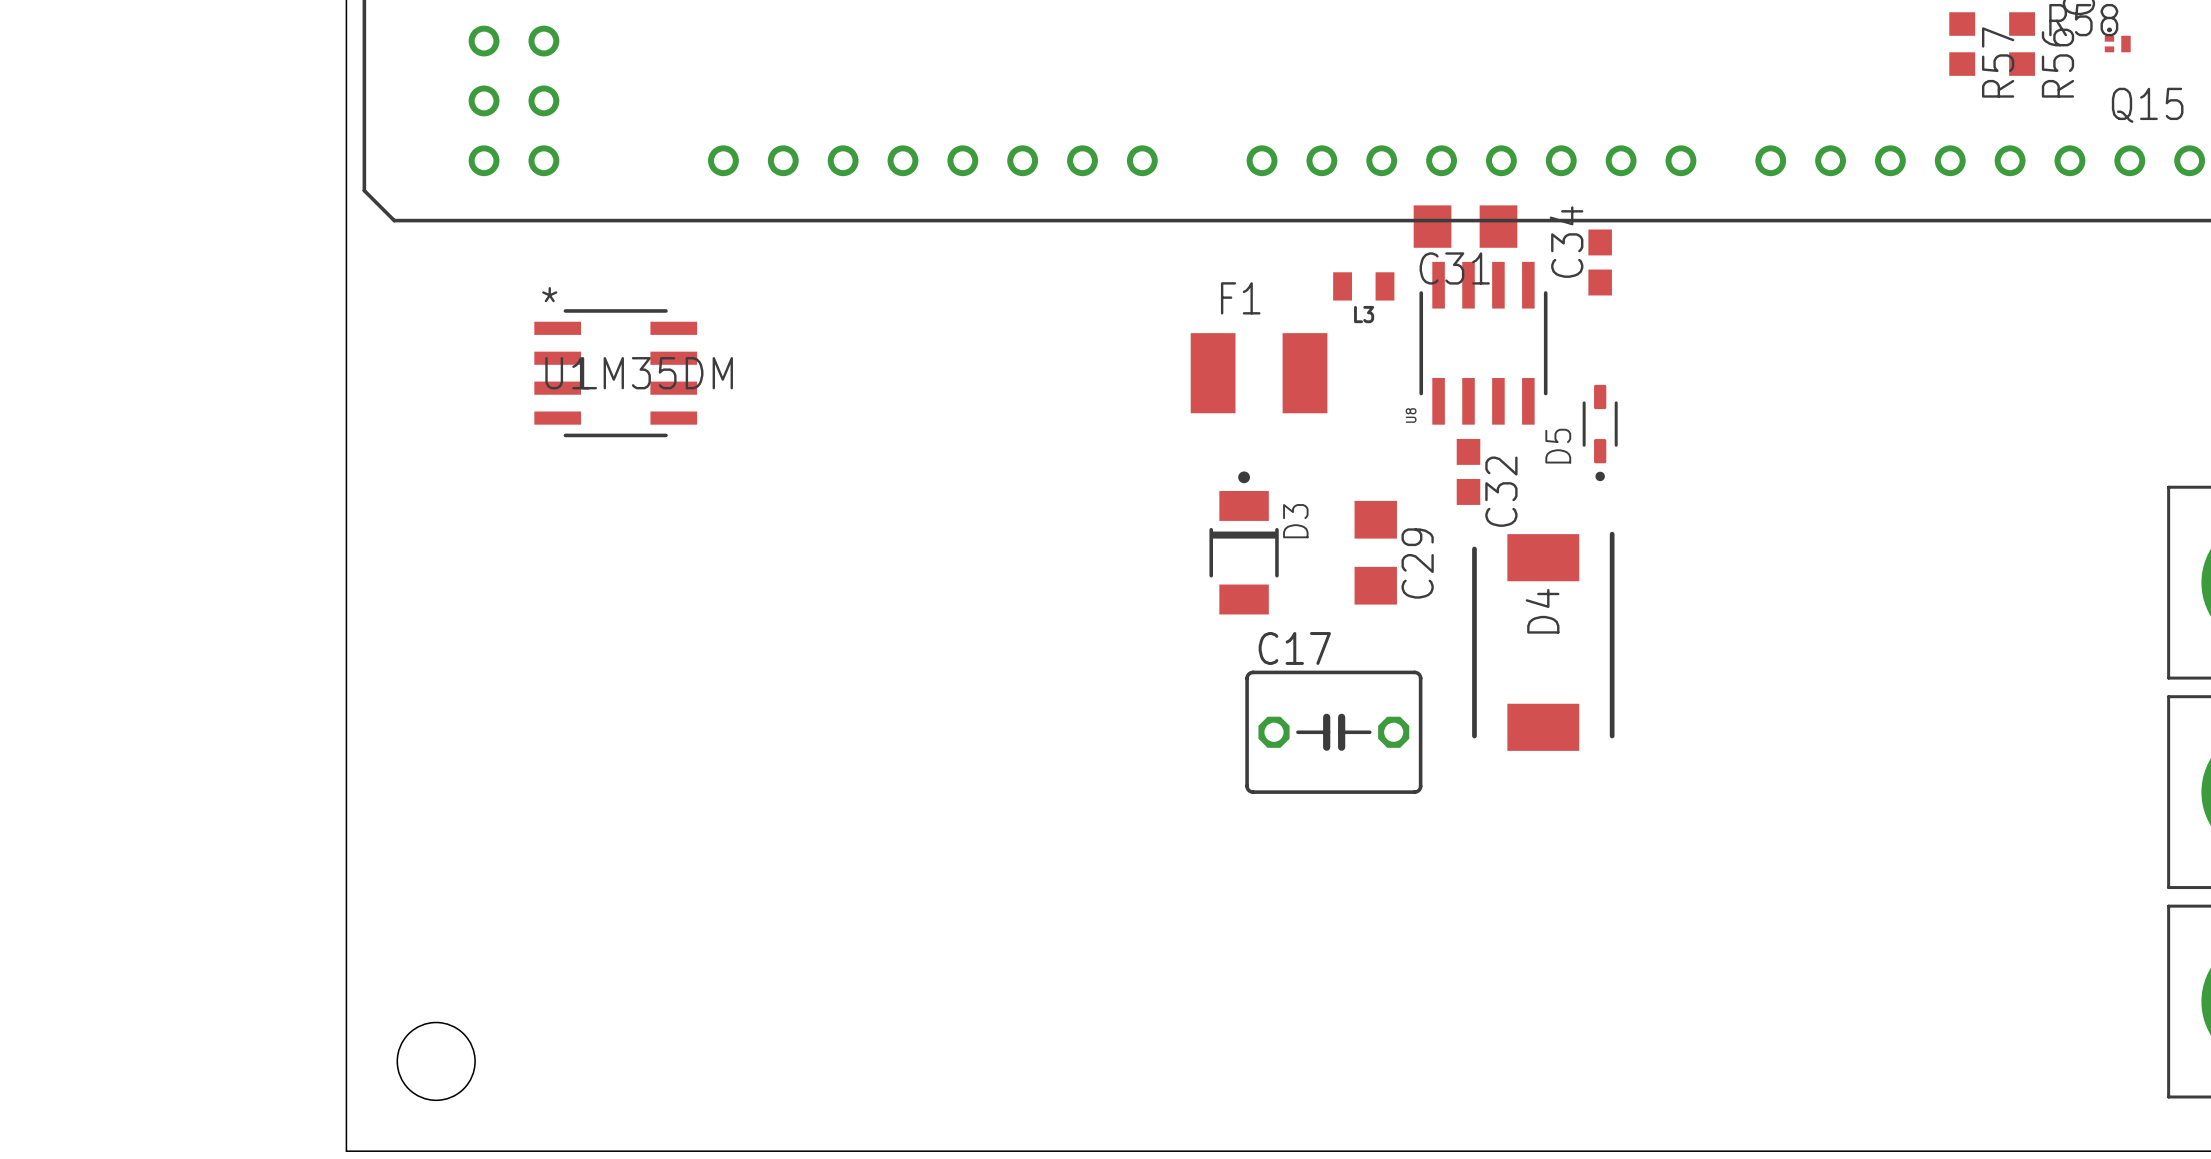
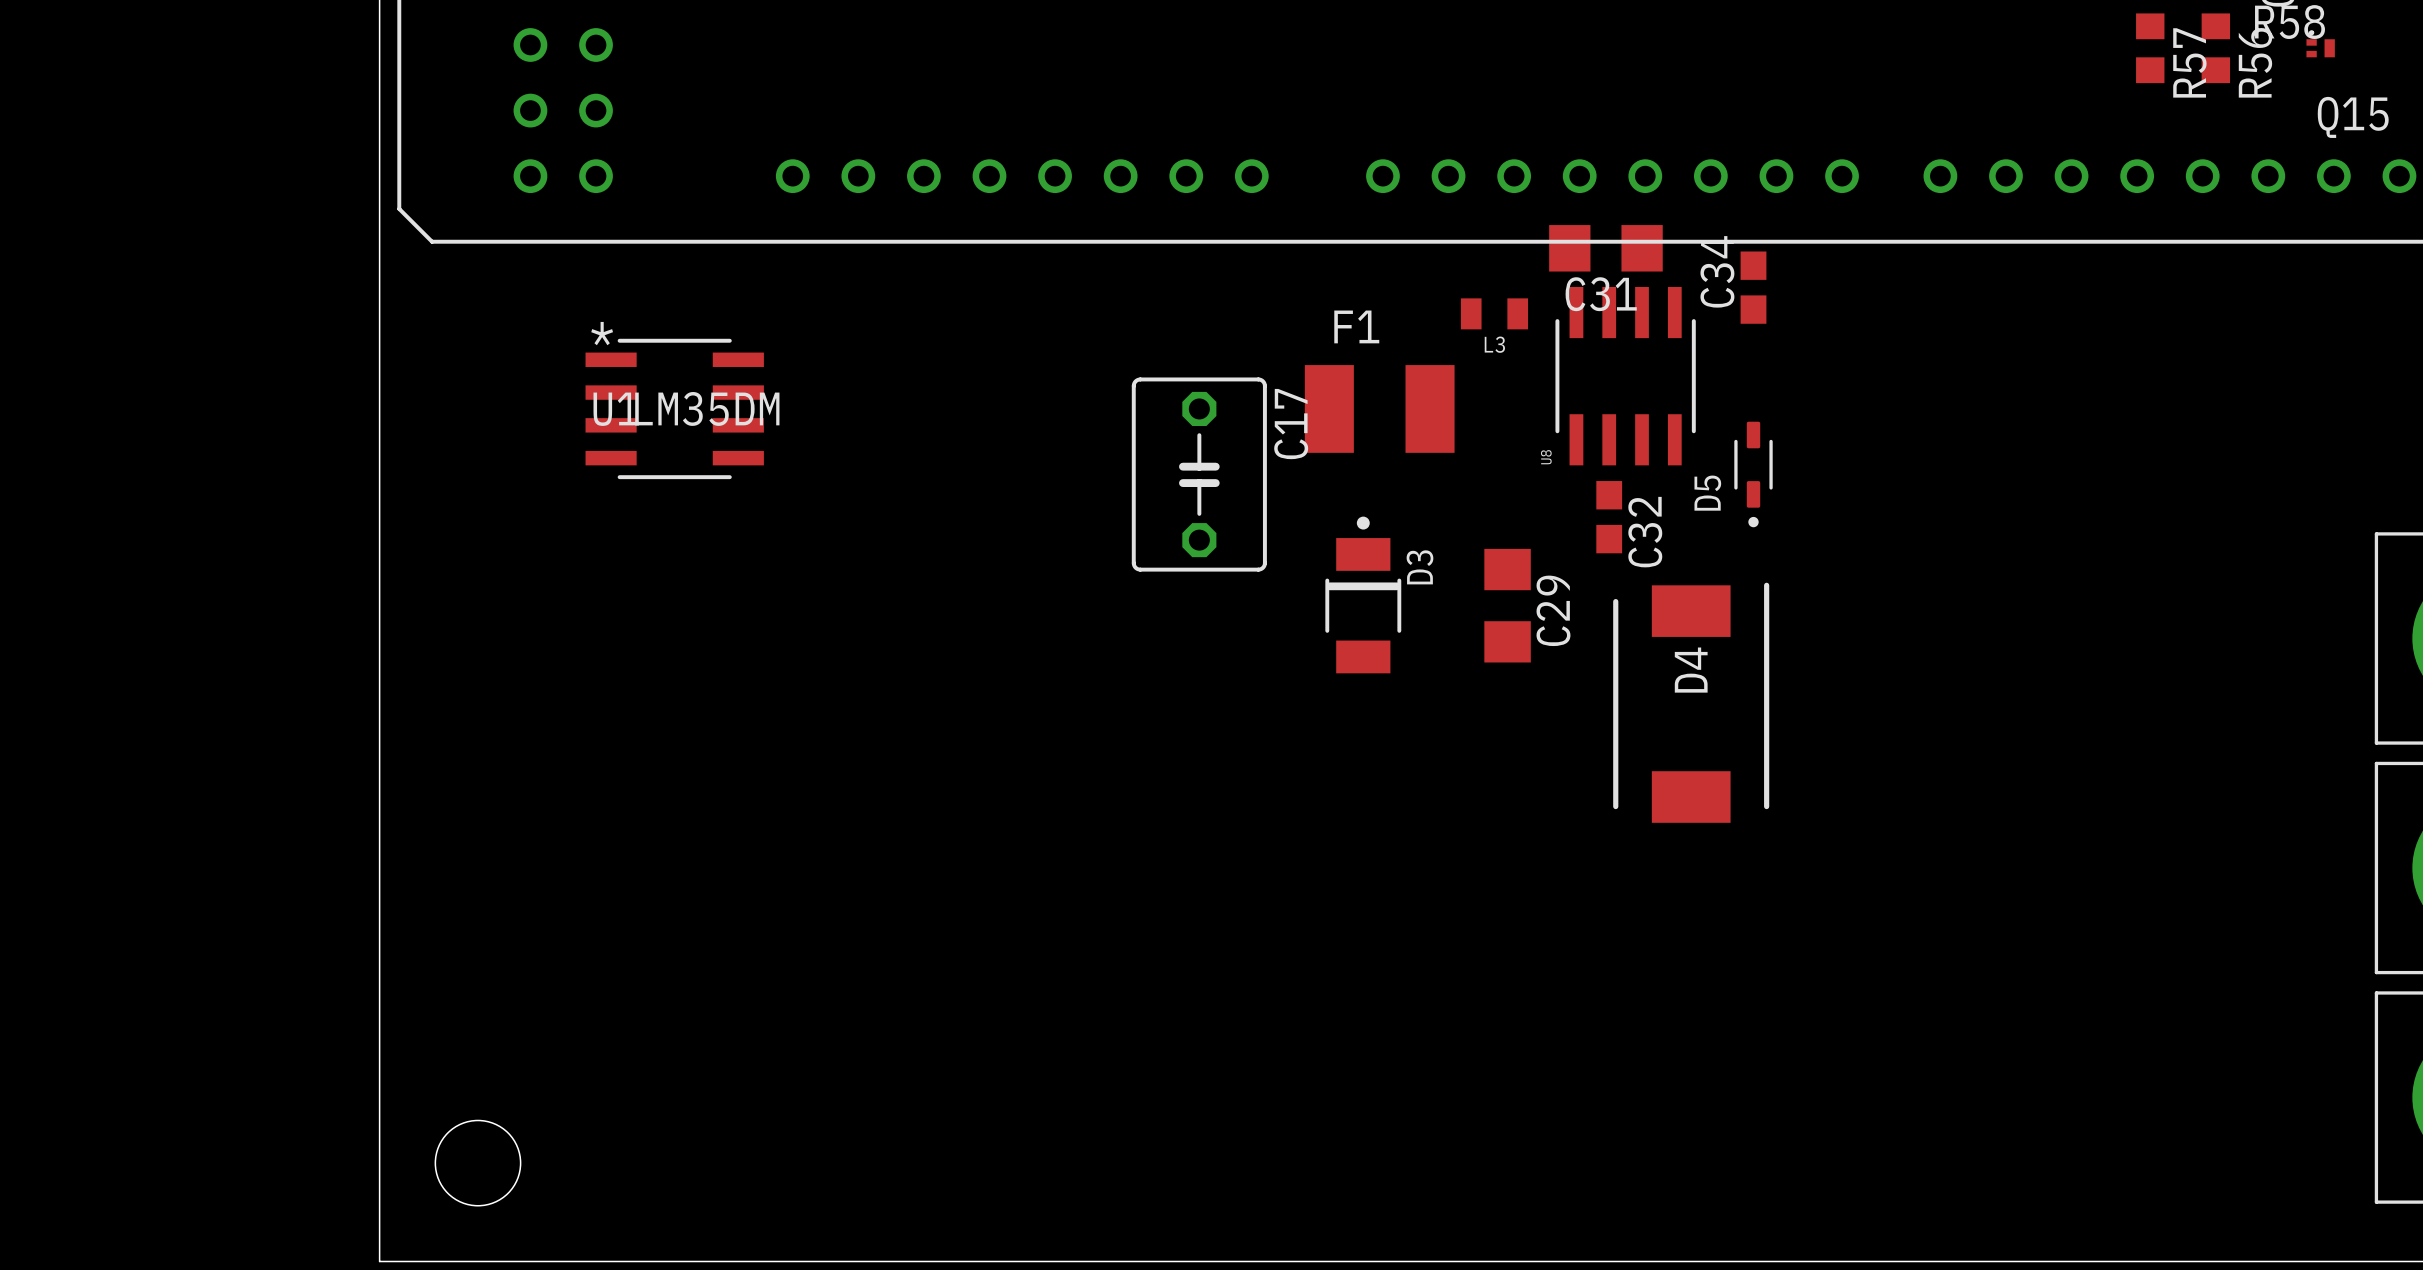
C17 rotation: 0° (1333, 732) -> 90° clockwise (1199, 474)
C17 position: (1333, 732) -> (1199, 474)

